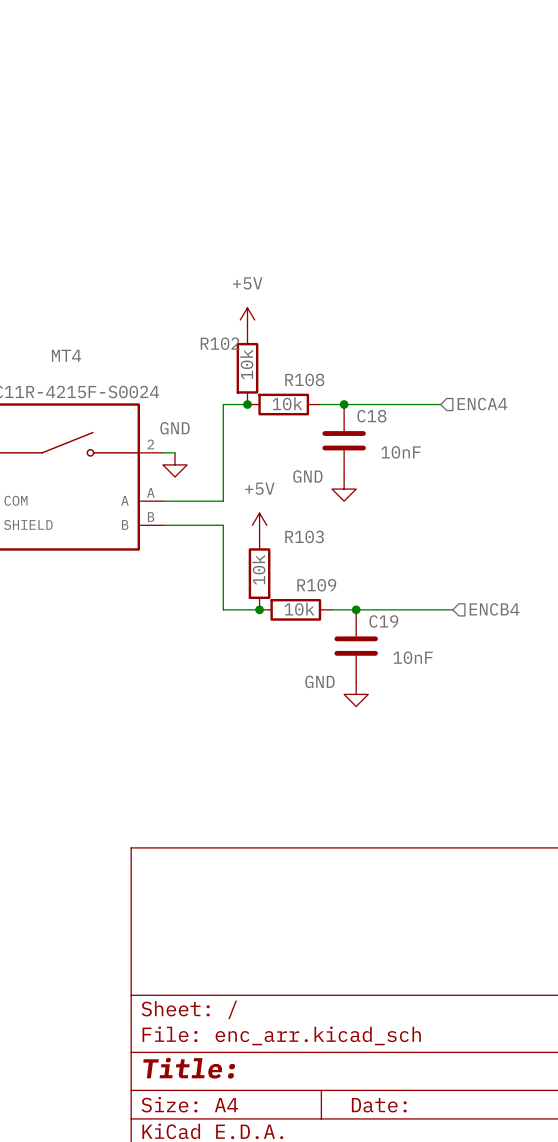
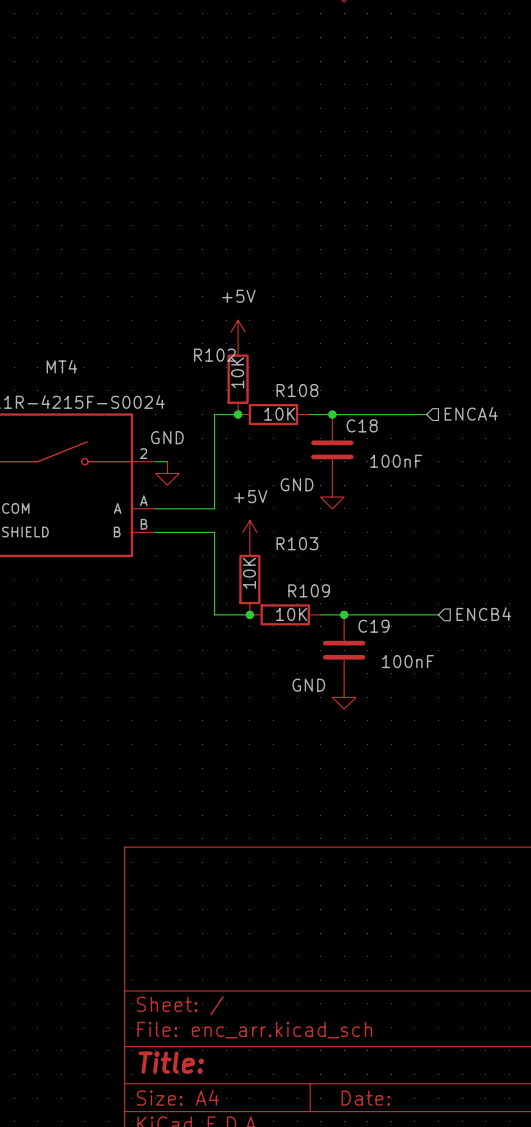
R102 value: 10k (246, 364) -> 10K (237, 372)
R108 value: 10k (287, 403) -> 10K (279, 414)
C18 value: 10nF (400, 452) -> 100nF (396, 461)
R103 value: 10k (258, 569) -> 10K (249, 573)
R109 value: 10k (299, 609) -> 10K (291, 614)
C19 value: 10nF (413, 657) -> 100nF (407, 661)

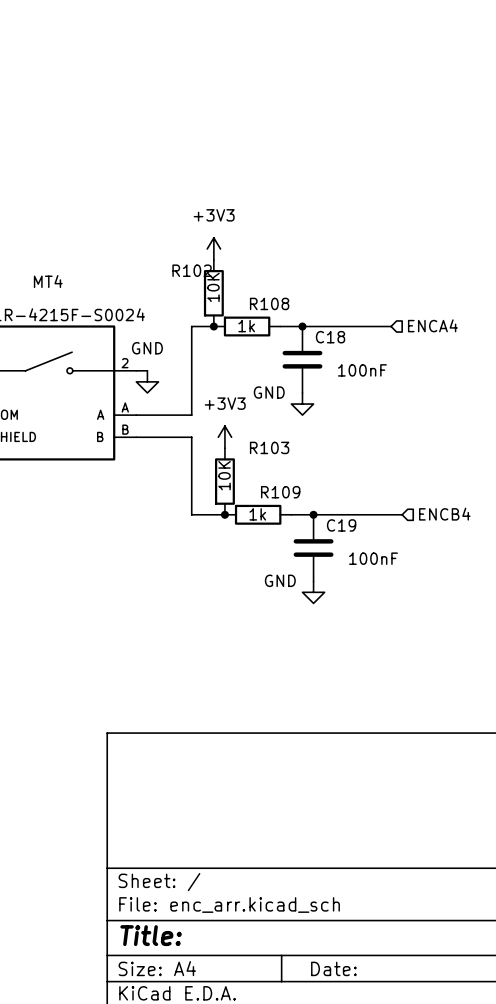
power symbol: +5V (238, 332) -> +3V3 (213, 248)
R108 value: 10K (279, 414) -> 1k (246, 326)
power symbol: +5V (249, 532) -> +3V3 (224, 437)
R109 value: 10K (291, 614) -> 1k (257, 514)

